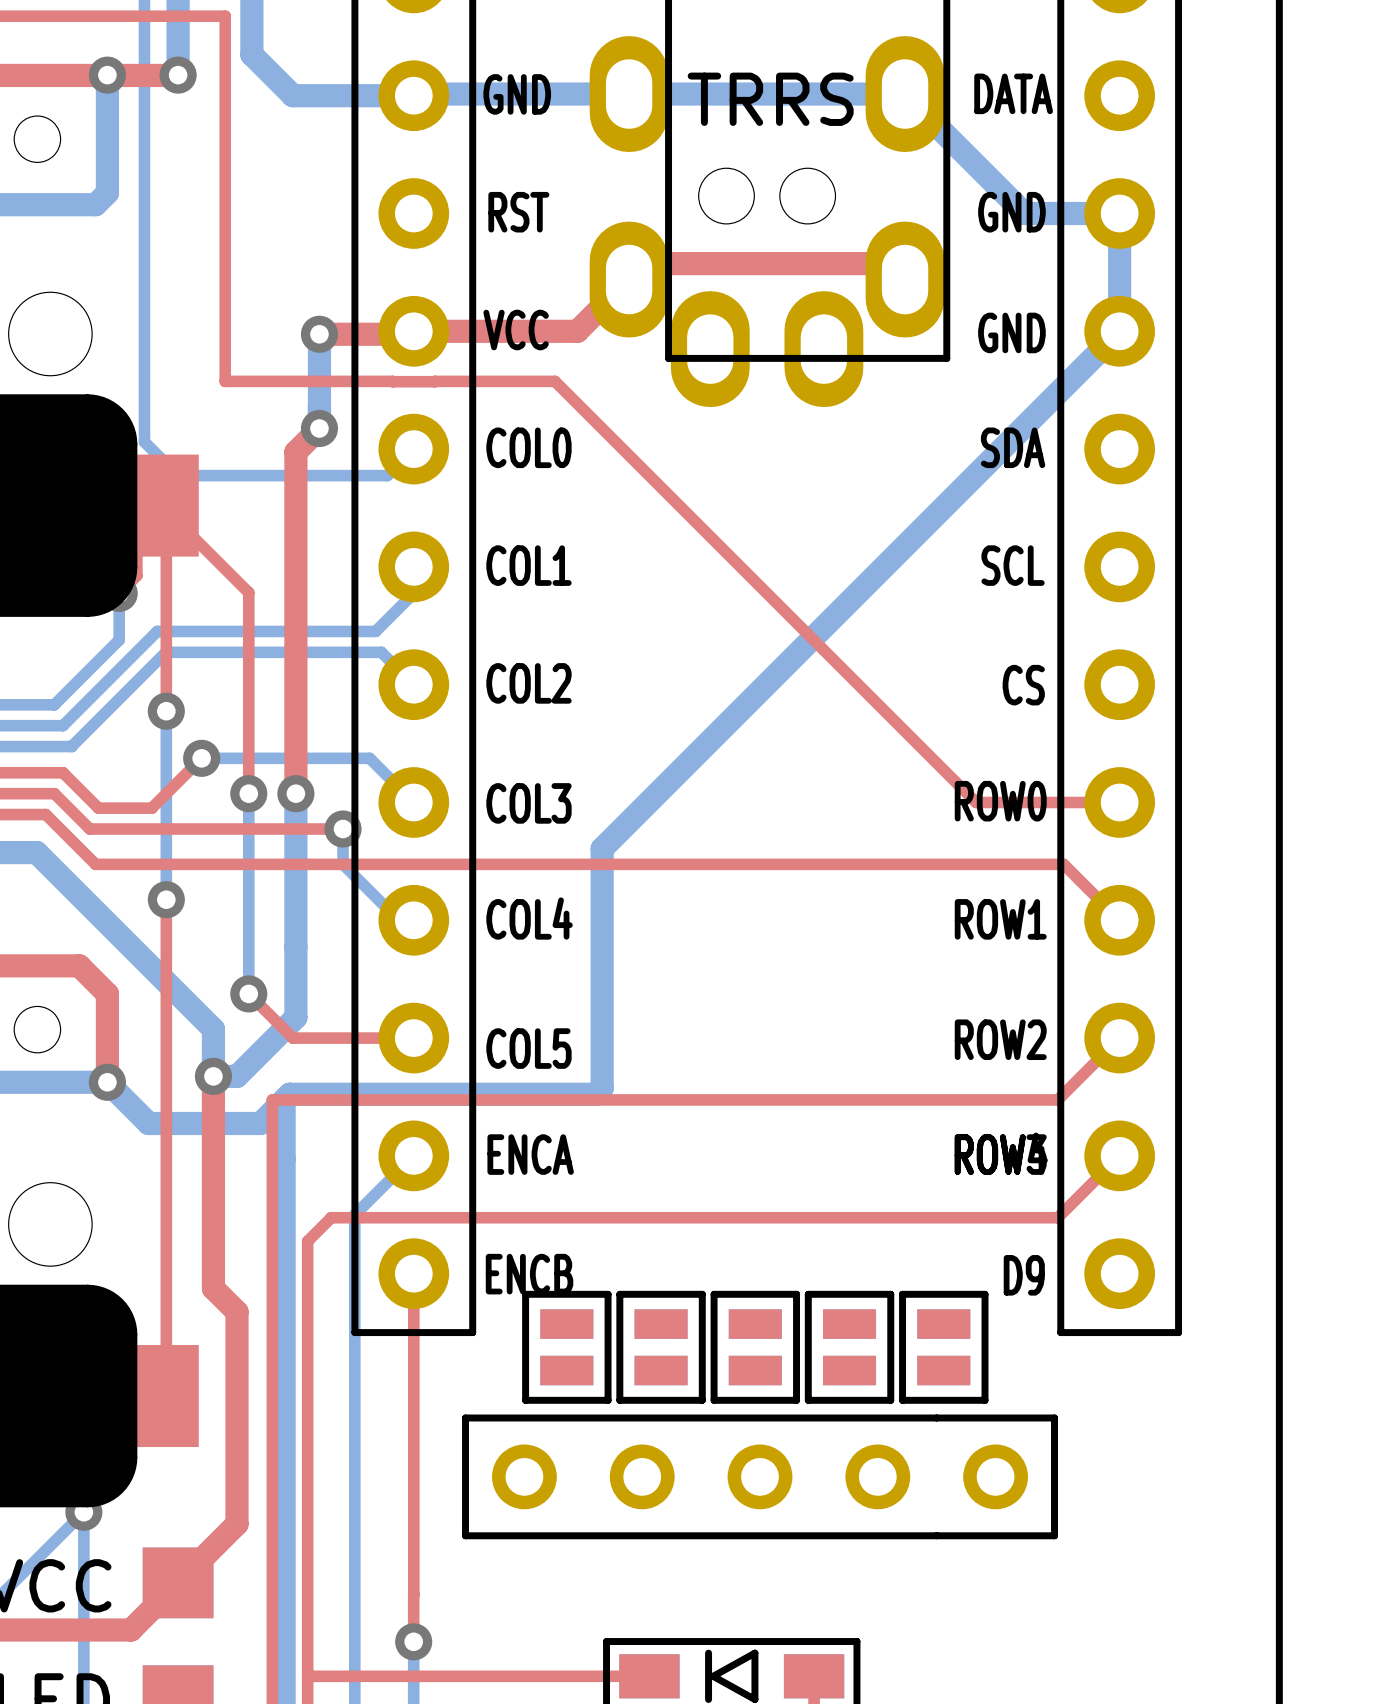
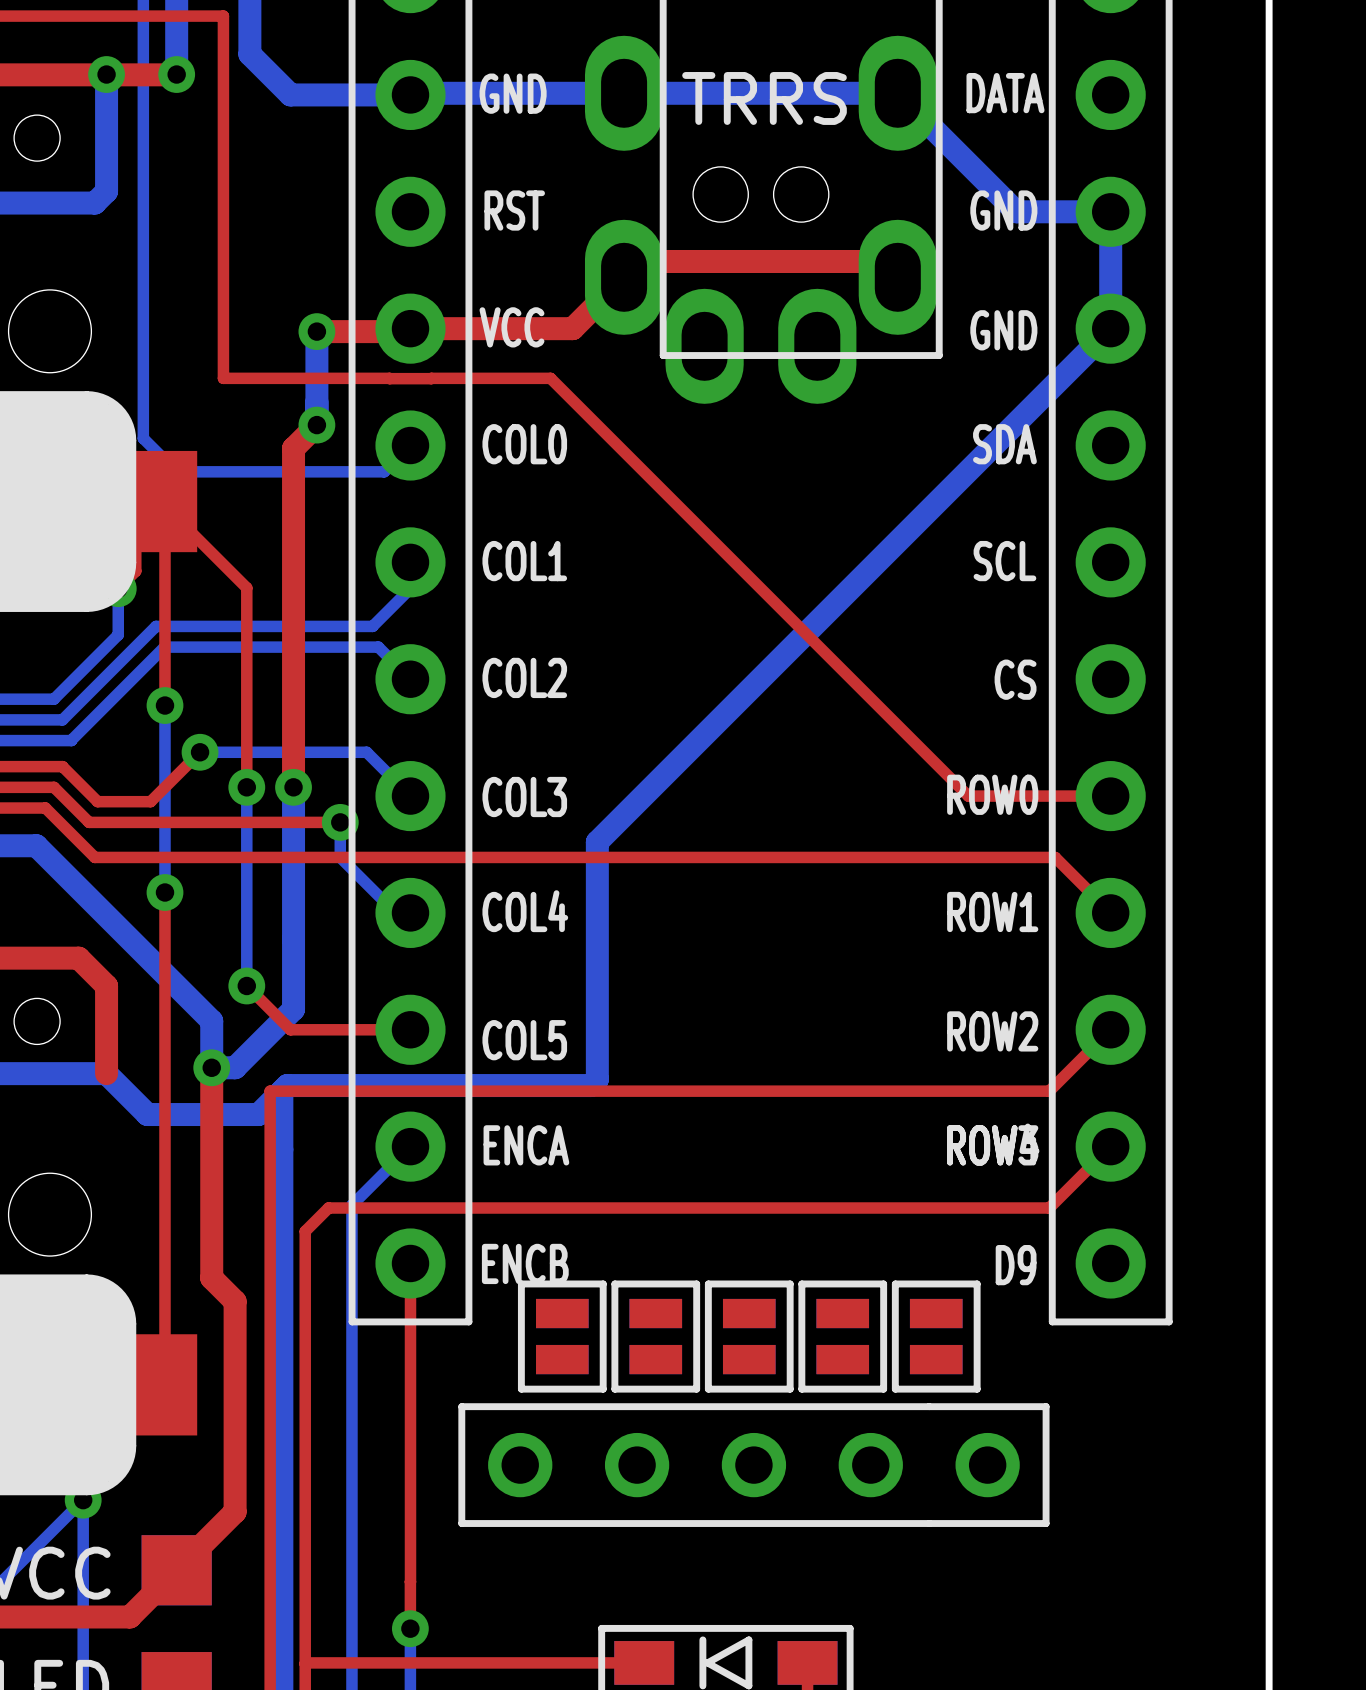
via: (107, 1082) -> none

